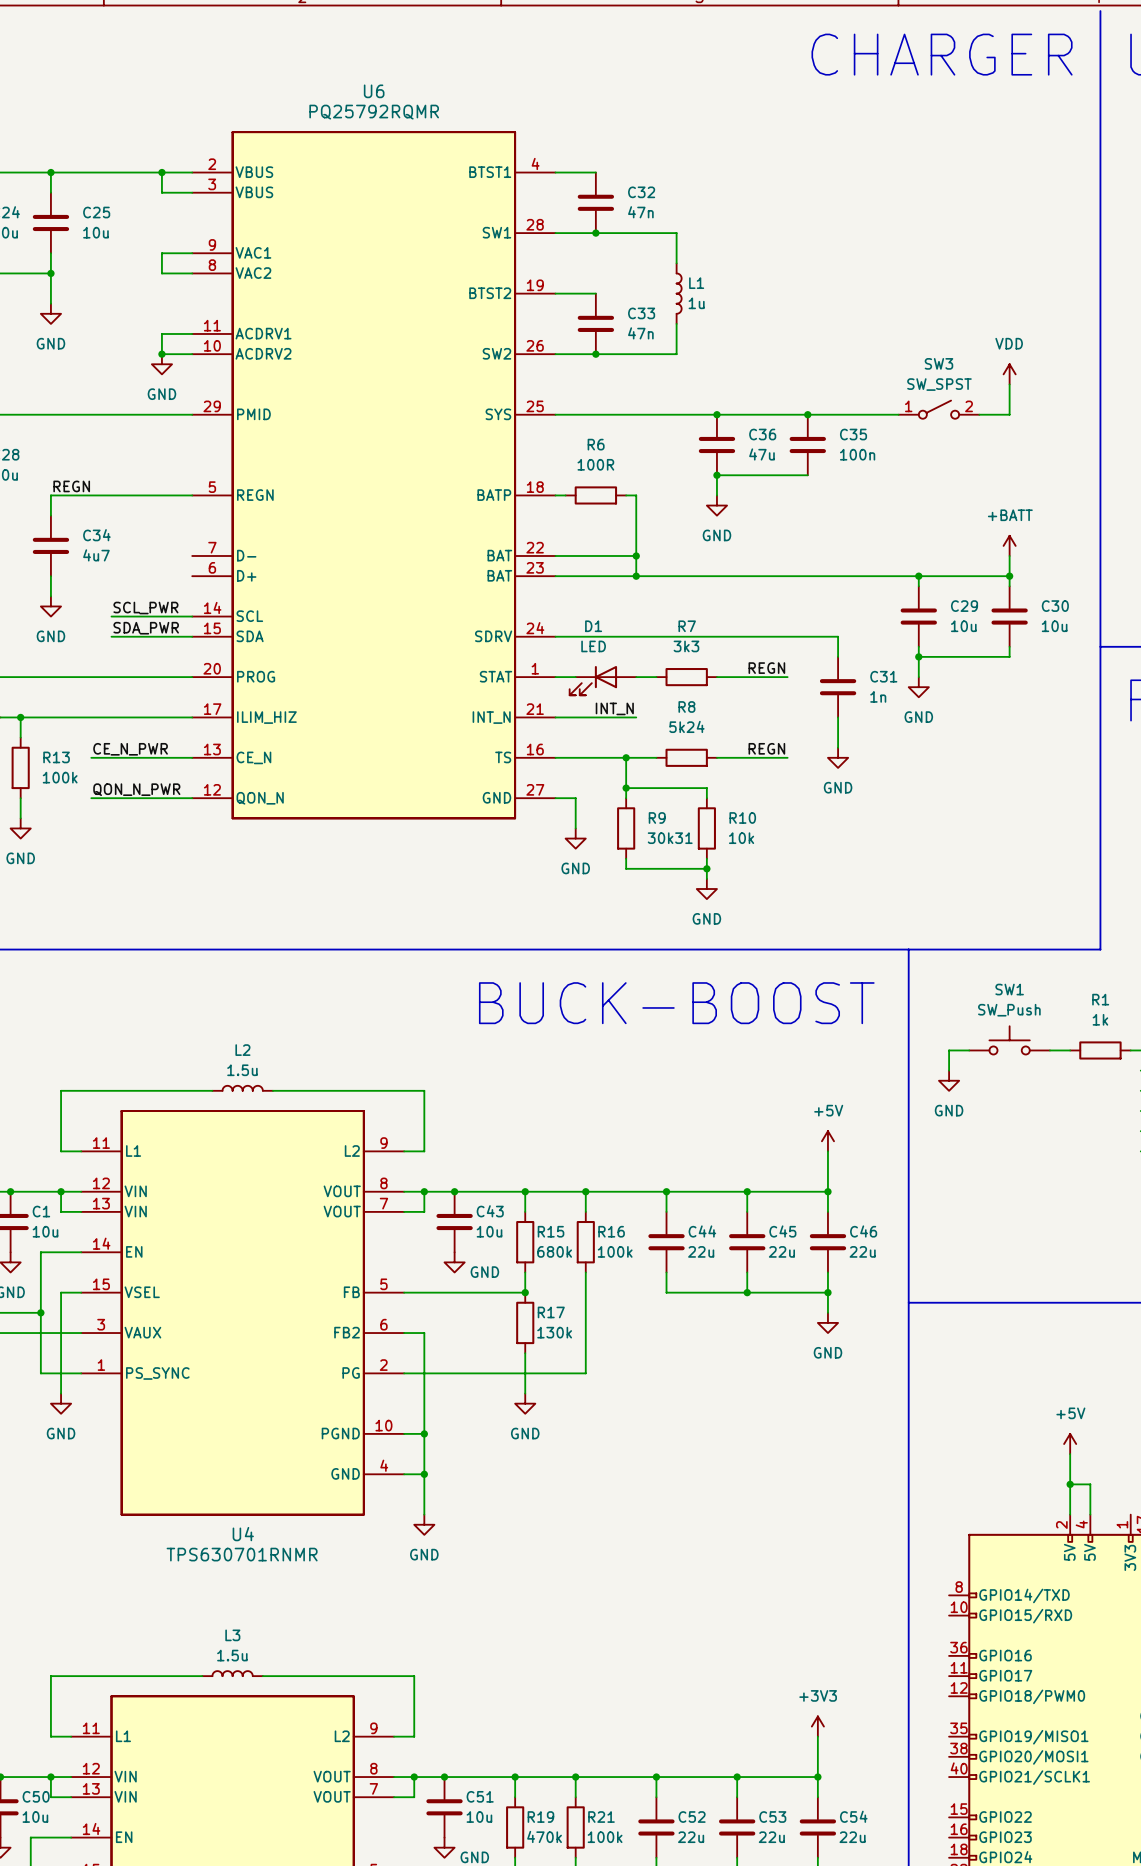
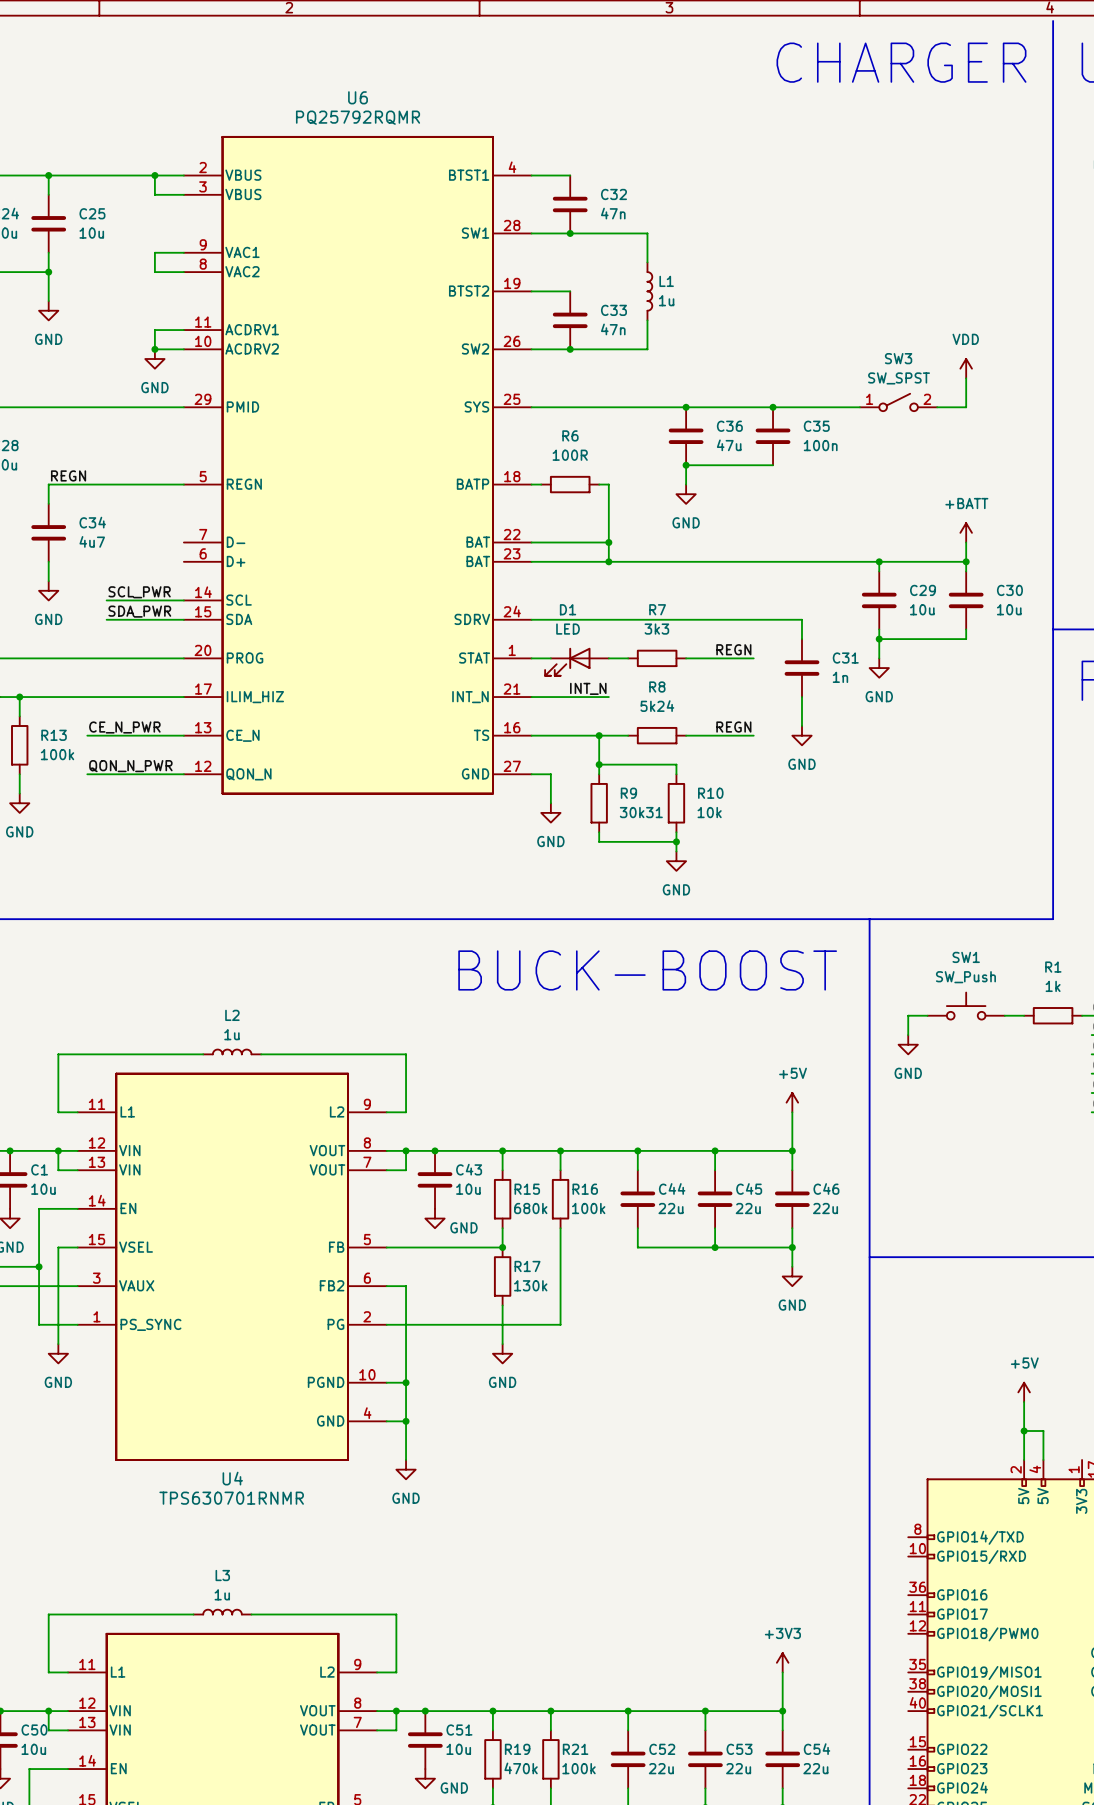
L2 value: 1.5u (242, 1070) -> 1u (231, 1034)
L3 value: 1.5u (232, 1655) -> 1u (222, 1594)

